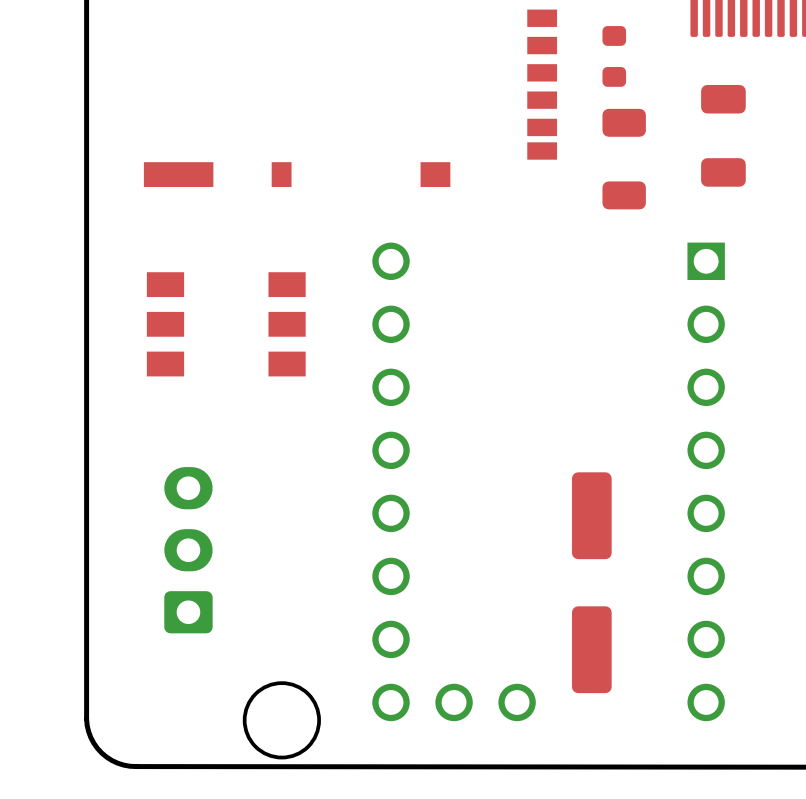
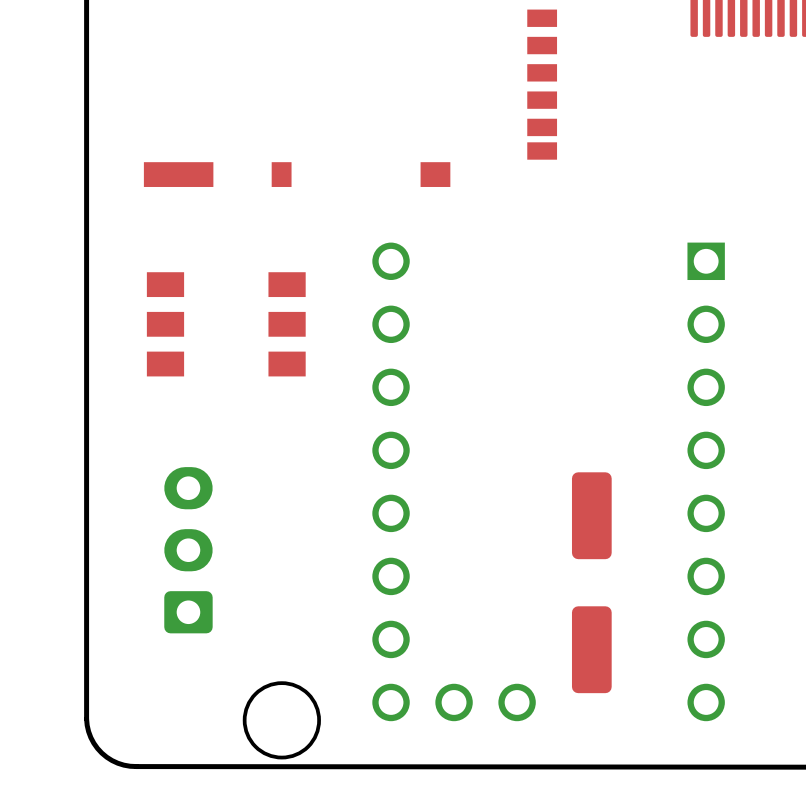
part: (614, 56) -> none
part: (723, 135) -> none
part: (624, 159) -> none

